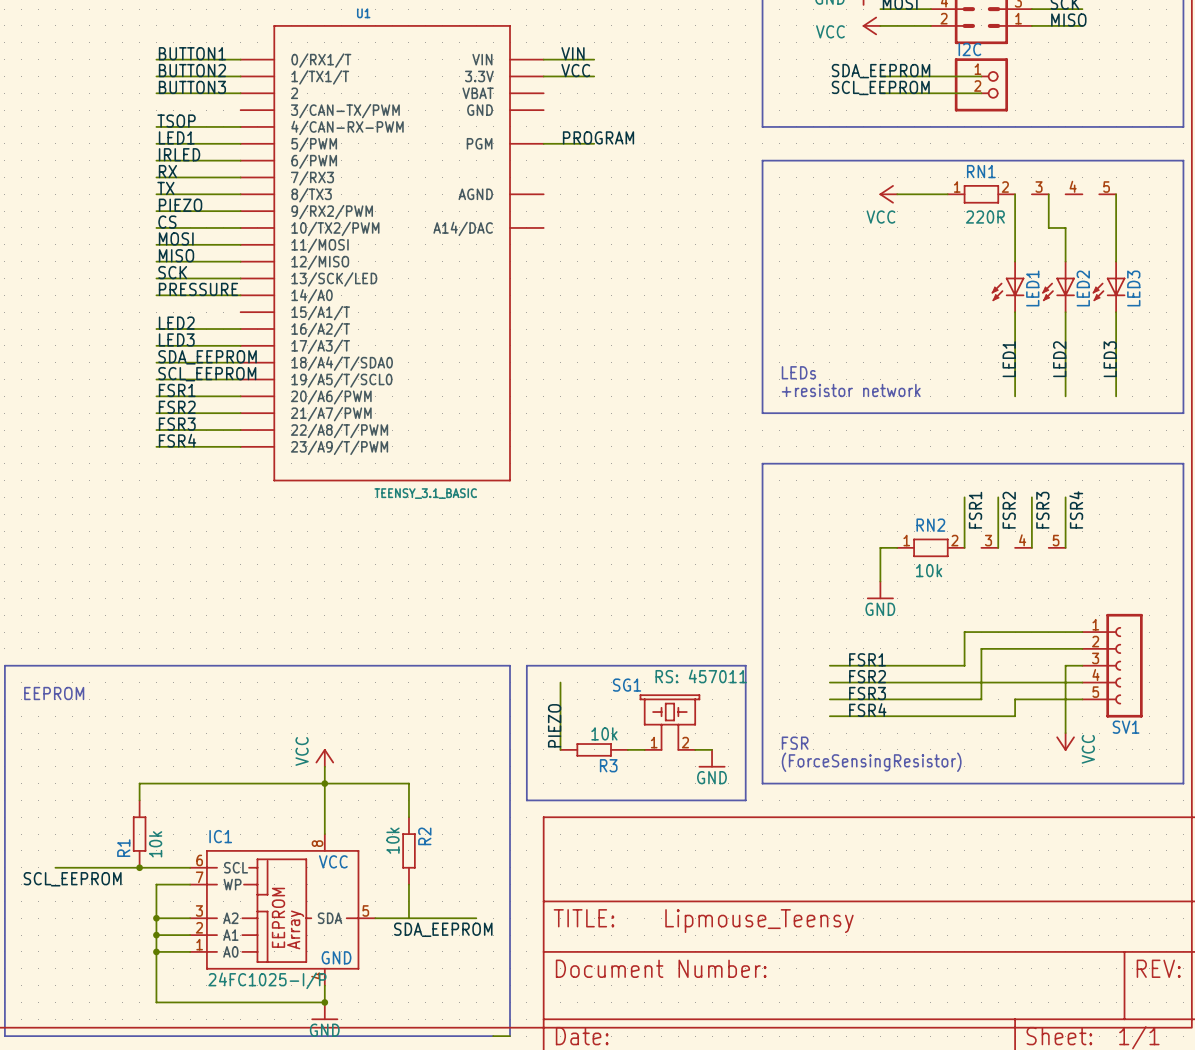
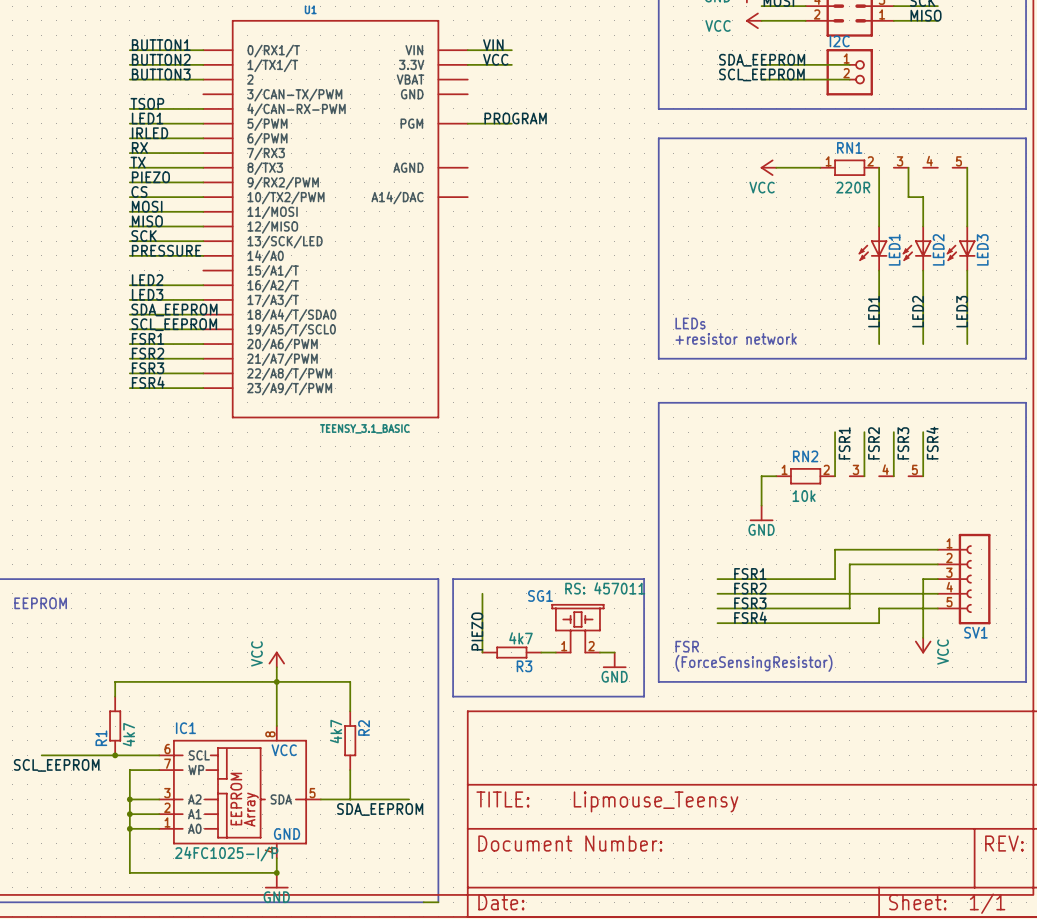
R3 value: 10k (604, 733) -> 4k7 (520, 638)
R2 value: 10k (392, 840) -> 4k7 (336, 731)
R1 value: 10k (155, 844) -> 4k7 (128, 734)

